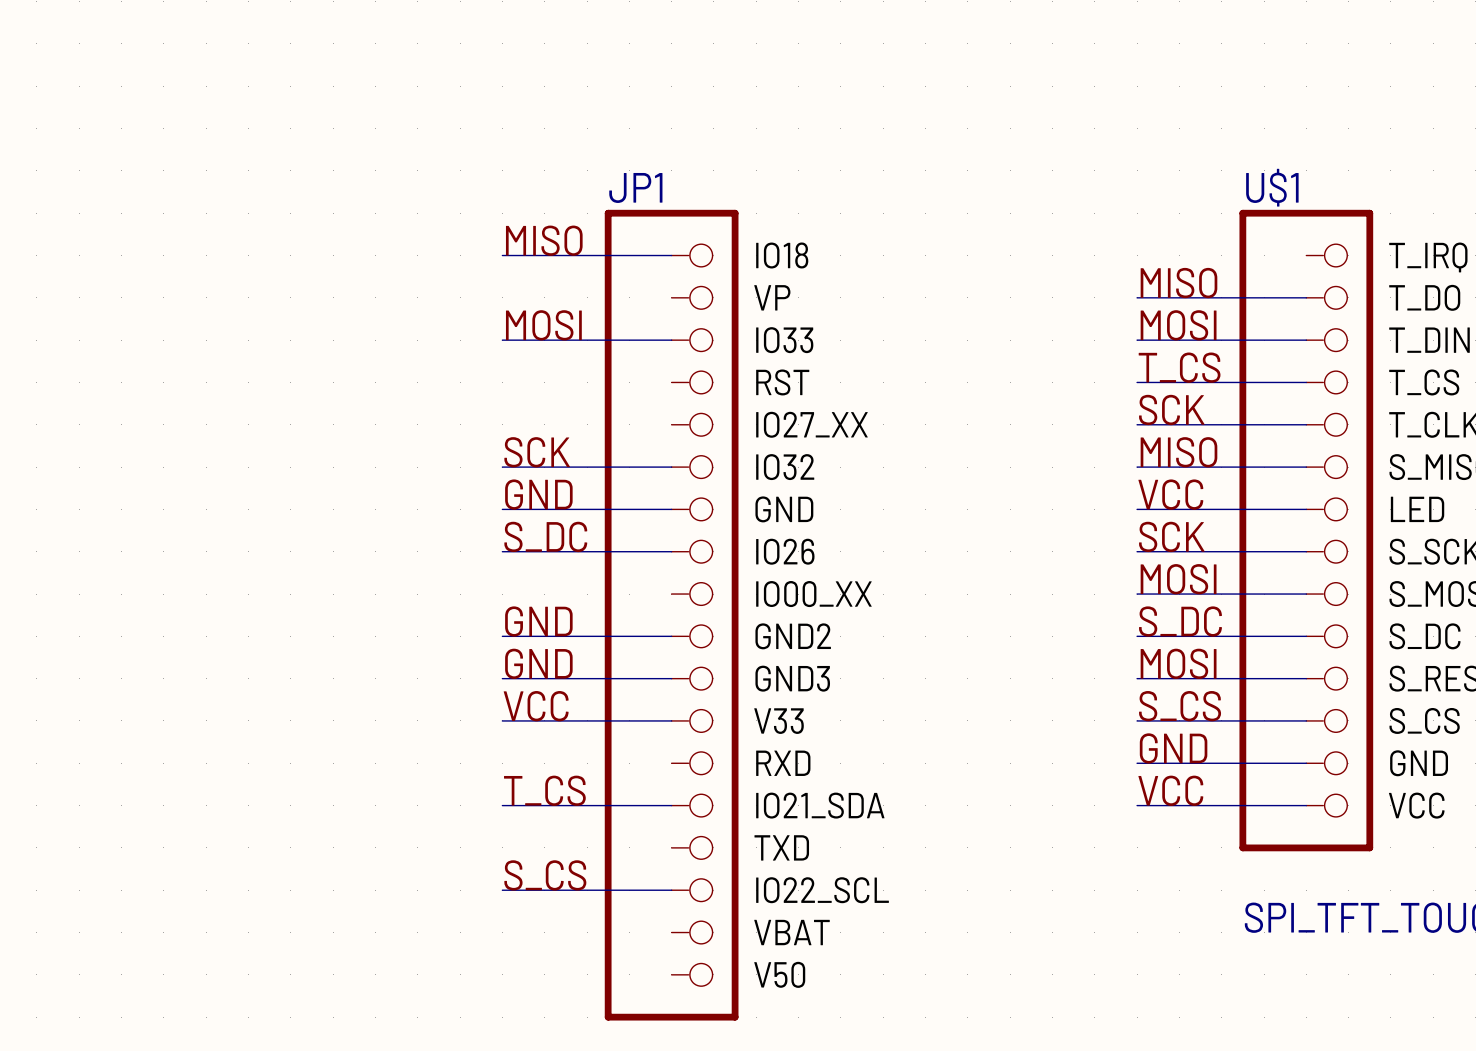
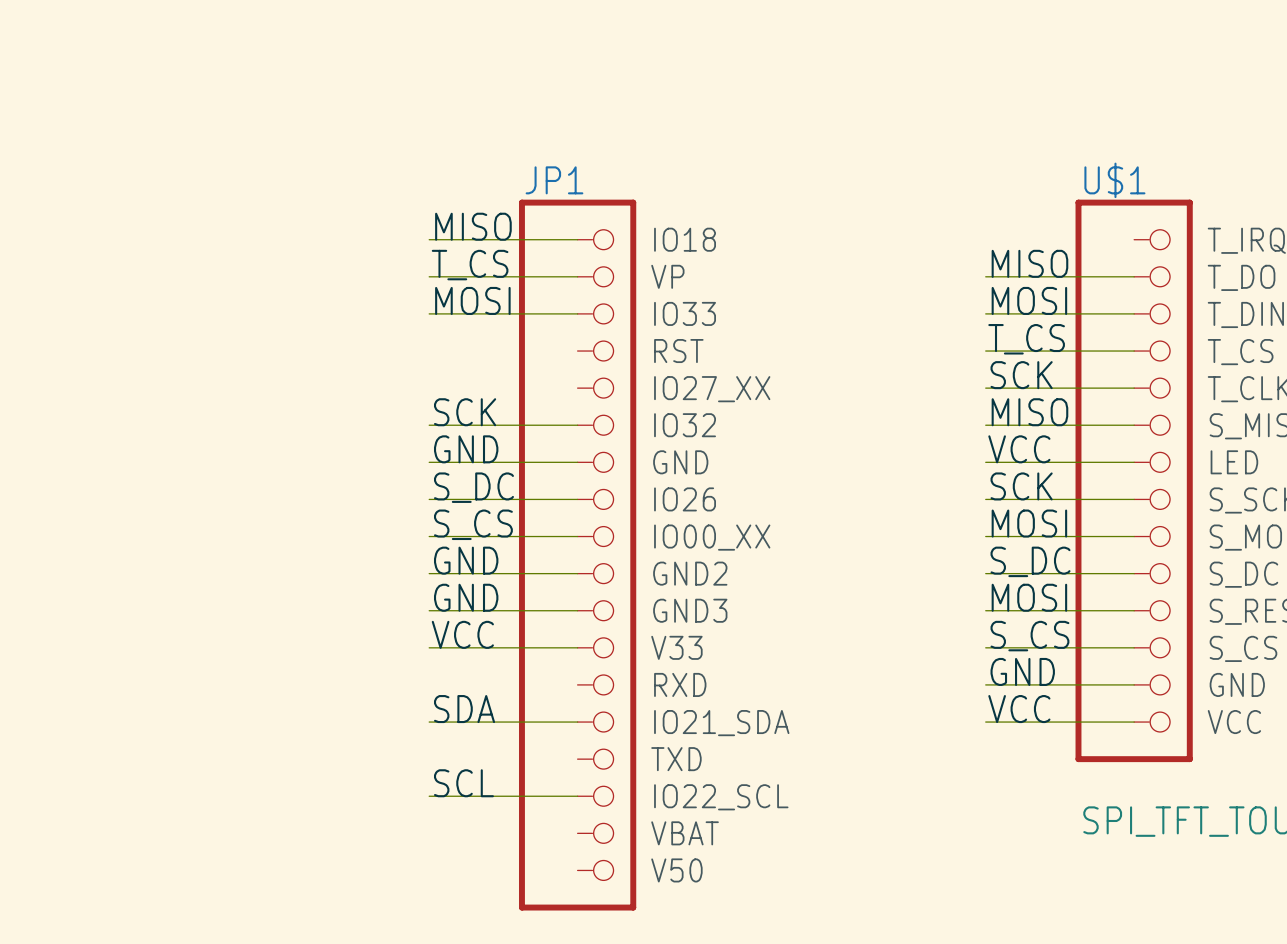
label: none -> T_CS (470, 265)
wire: none -> (429, 276) (577, 276)
label: none -> S_CS (473, 524)
wire: none -> (429, 536) (577, 536)
label: T_CS (544, 790) -> SDA (464, 709)
label: S_CS (545, 875) -> SCL (463, 783)

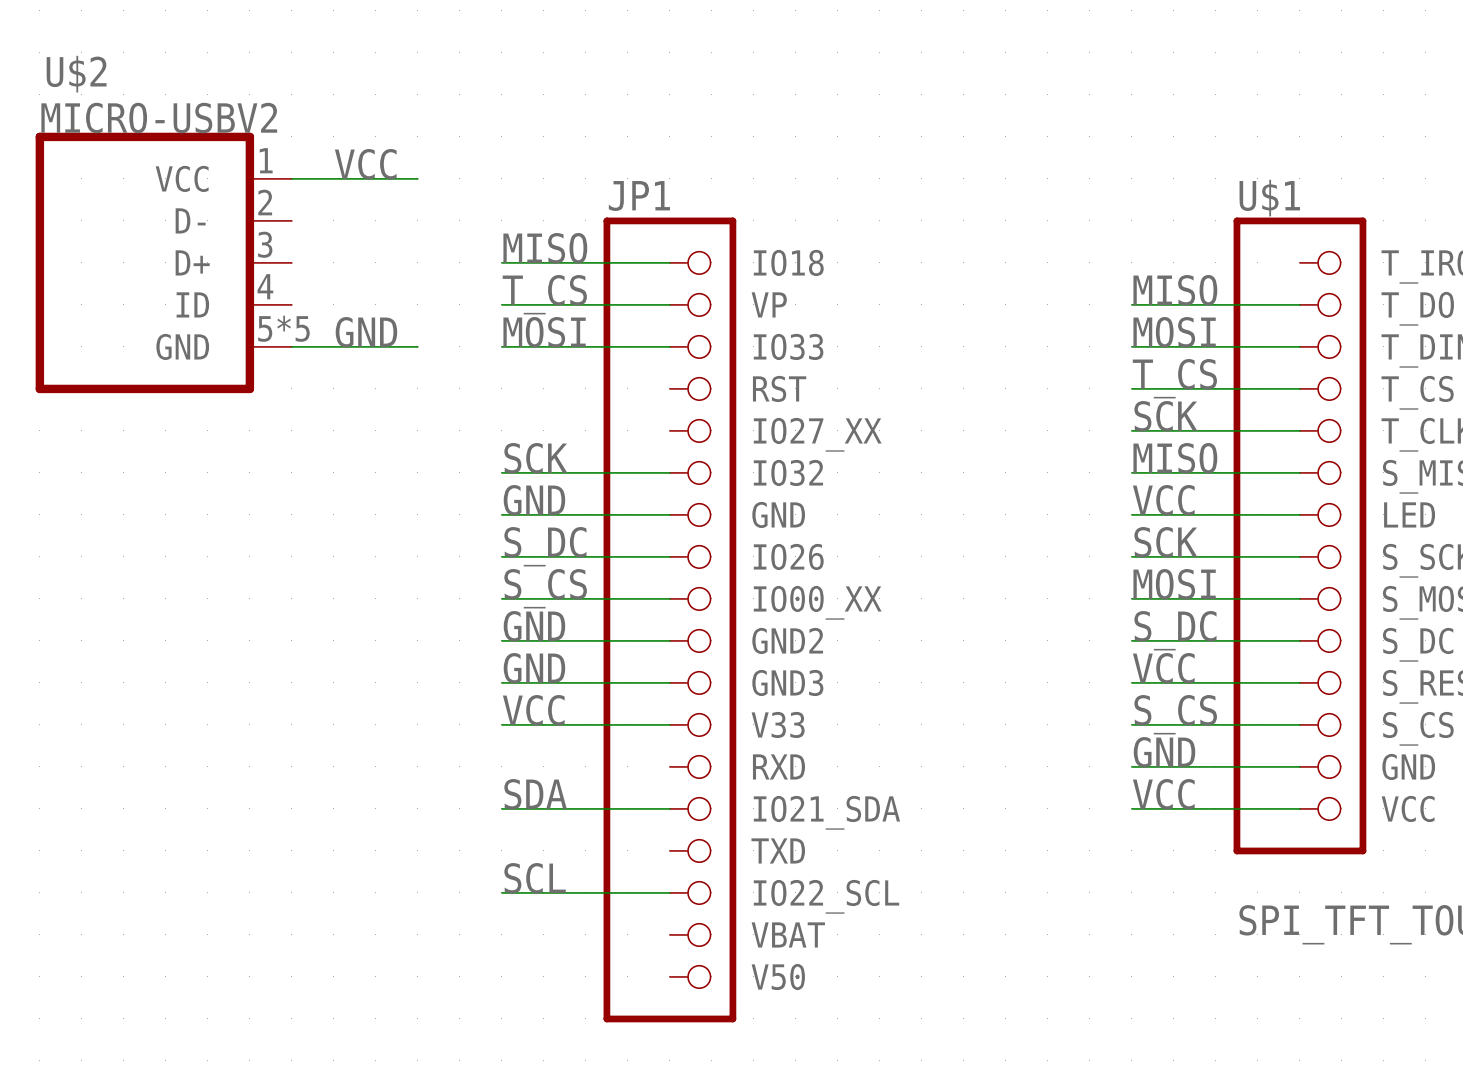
label: none -> VCC (365, 164)
wire: none -> (291, 178) (417, 178)
U$2: none -> MICRO-USBV2 (163, 262)
label: none -> GND (366, 332)
wire: none -> (291, 346) (417, 346)
label: MOSI (1029, 597) -> VCC (1163, 668)

